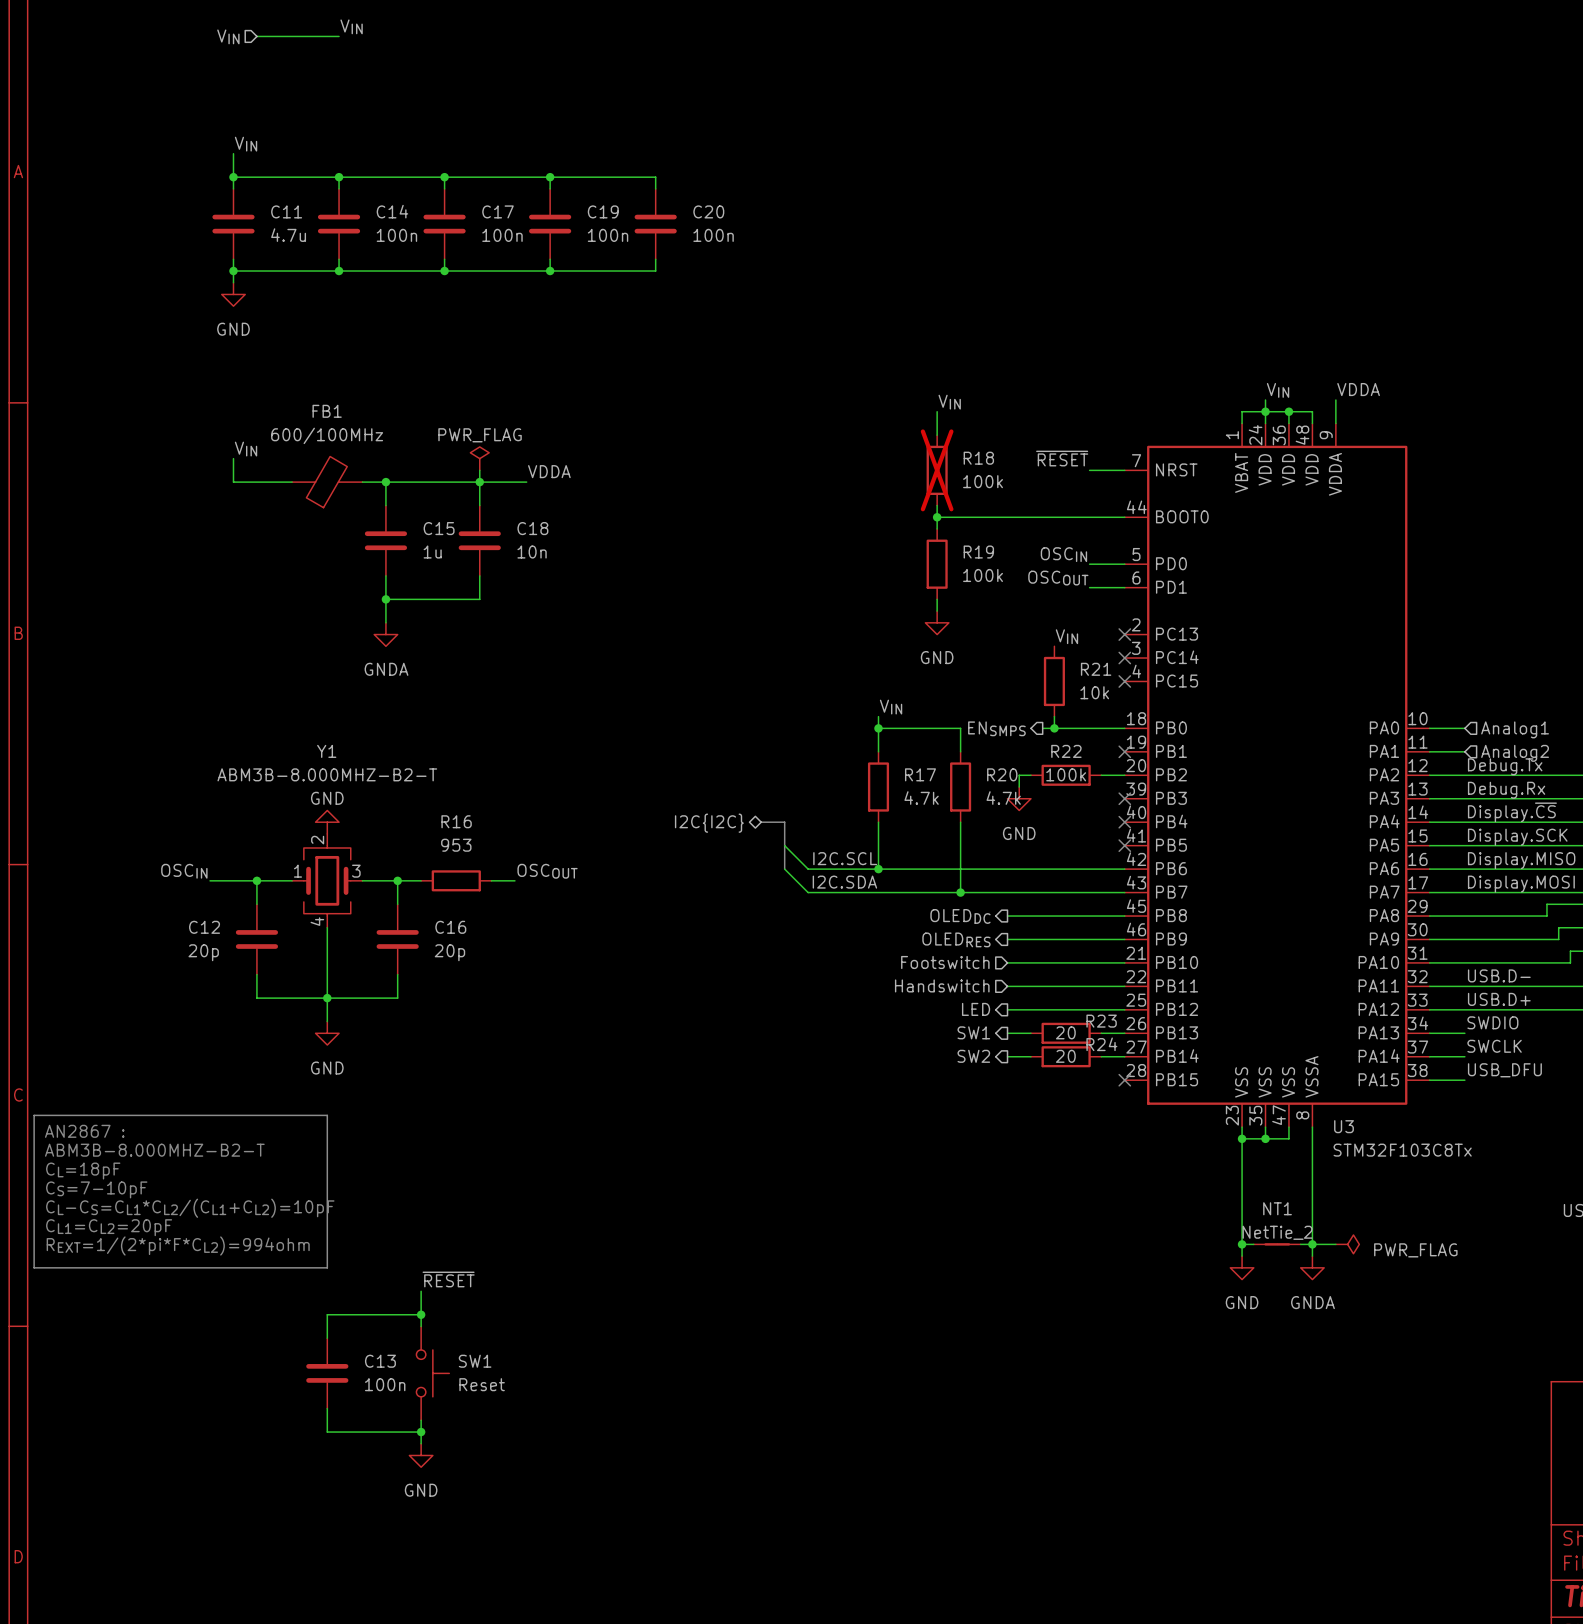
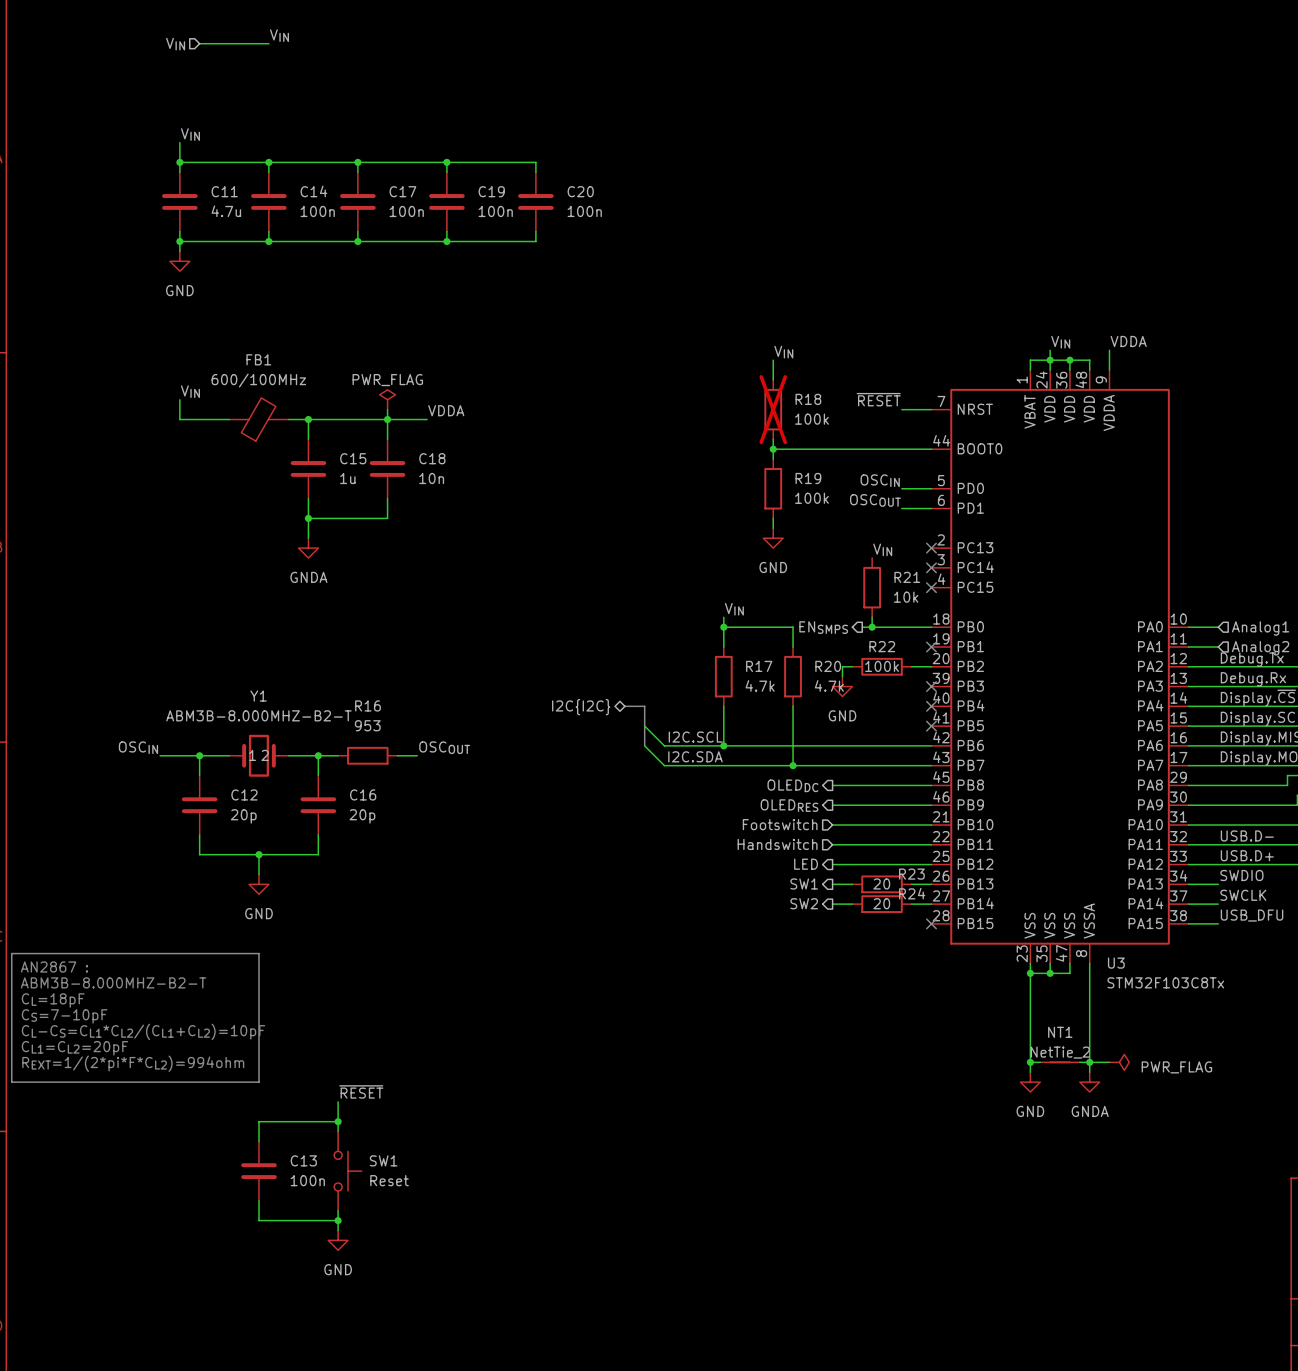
Y1 name position: Y1 (326, 751) -> Y1 (258, 696)
Y1 value position: ABM3B-8.000MHZ-B2-T (327, 774) -> ABM3B-8.000MHZ-B2-T (258, 715)
power symbol: GND (327, 822) -> none
Y1 symbol: [292, 833, 363, 928] -> [229, 734, 289, 777]
C12 name position: C12 (204, 927) -> C12 (244, 794)
wire: (327, 927) (327, 998) -> none
C12 value position: 20p (203, 952) -> 20p (243, 816)

